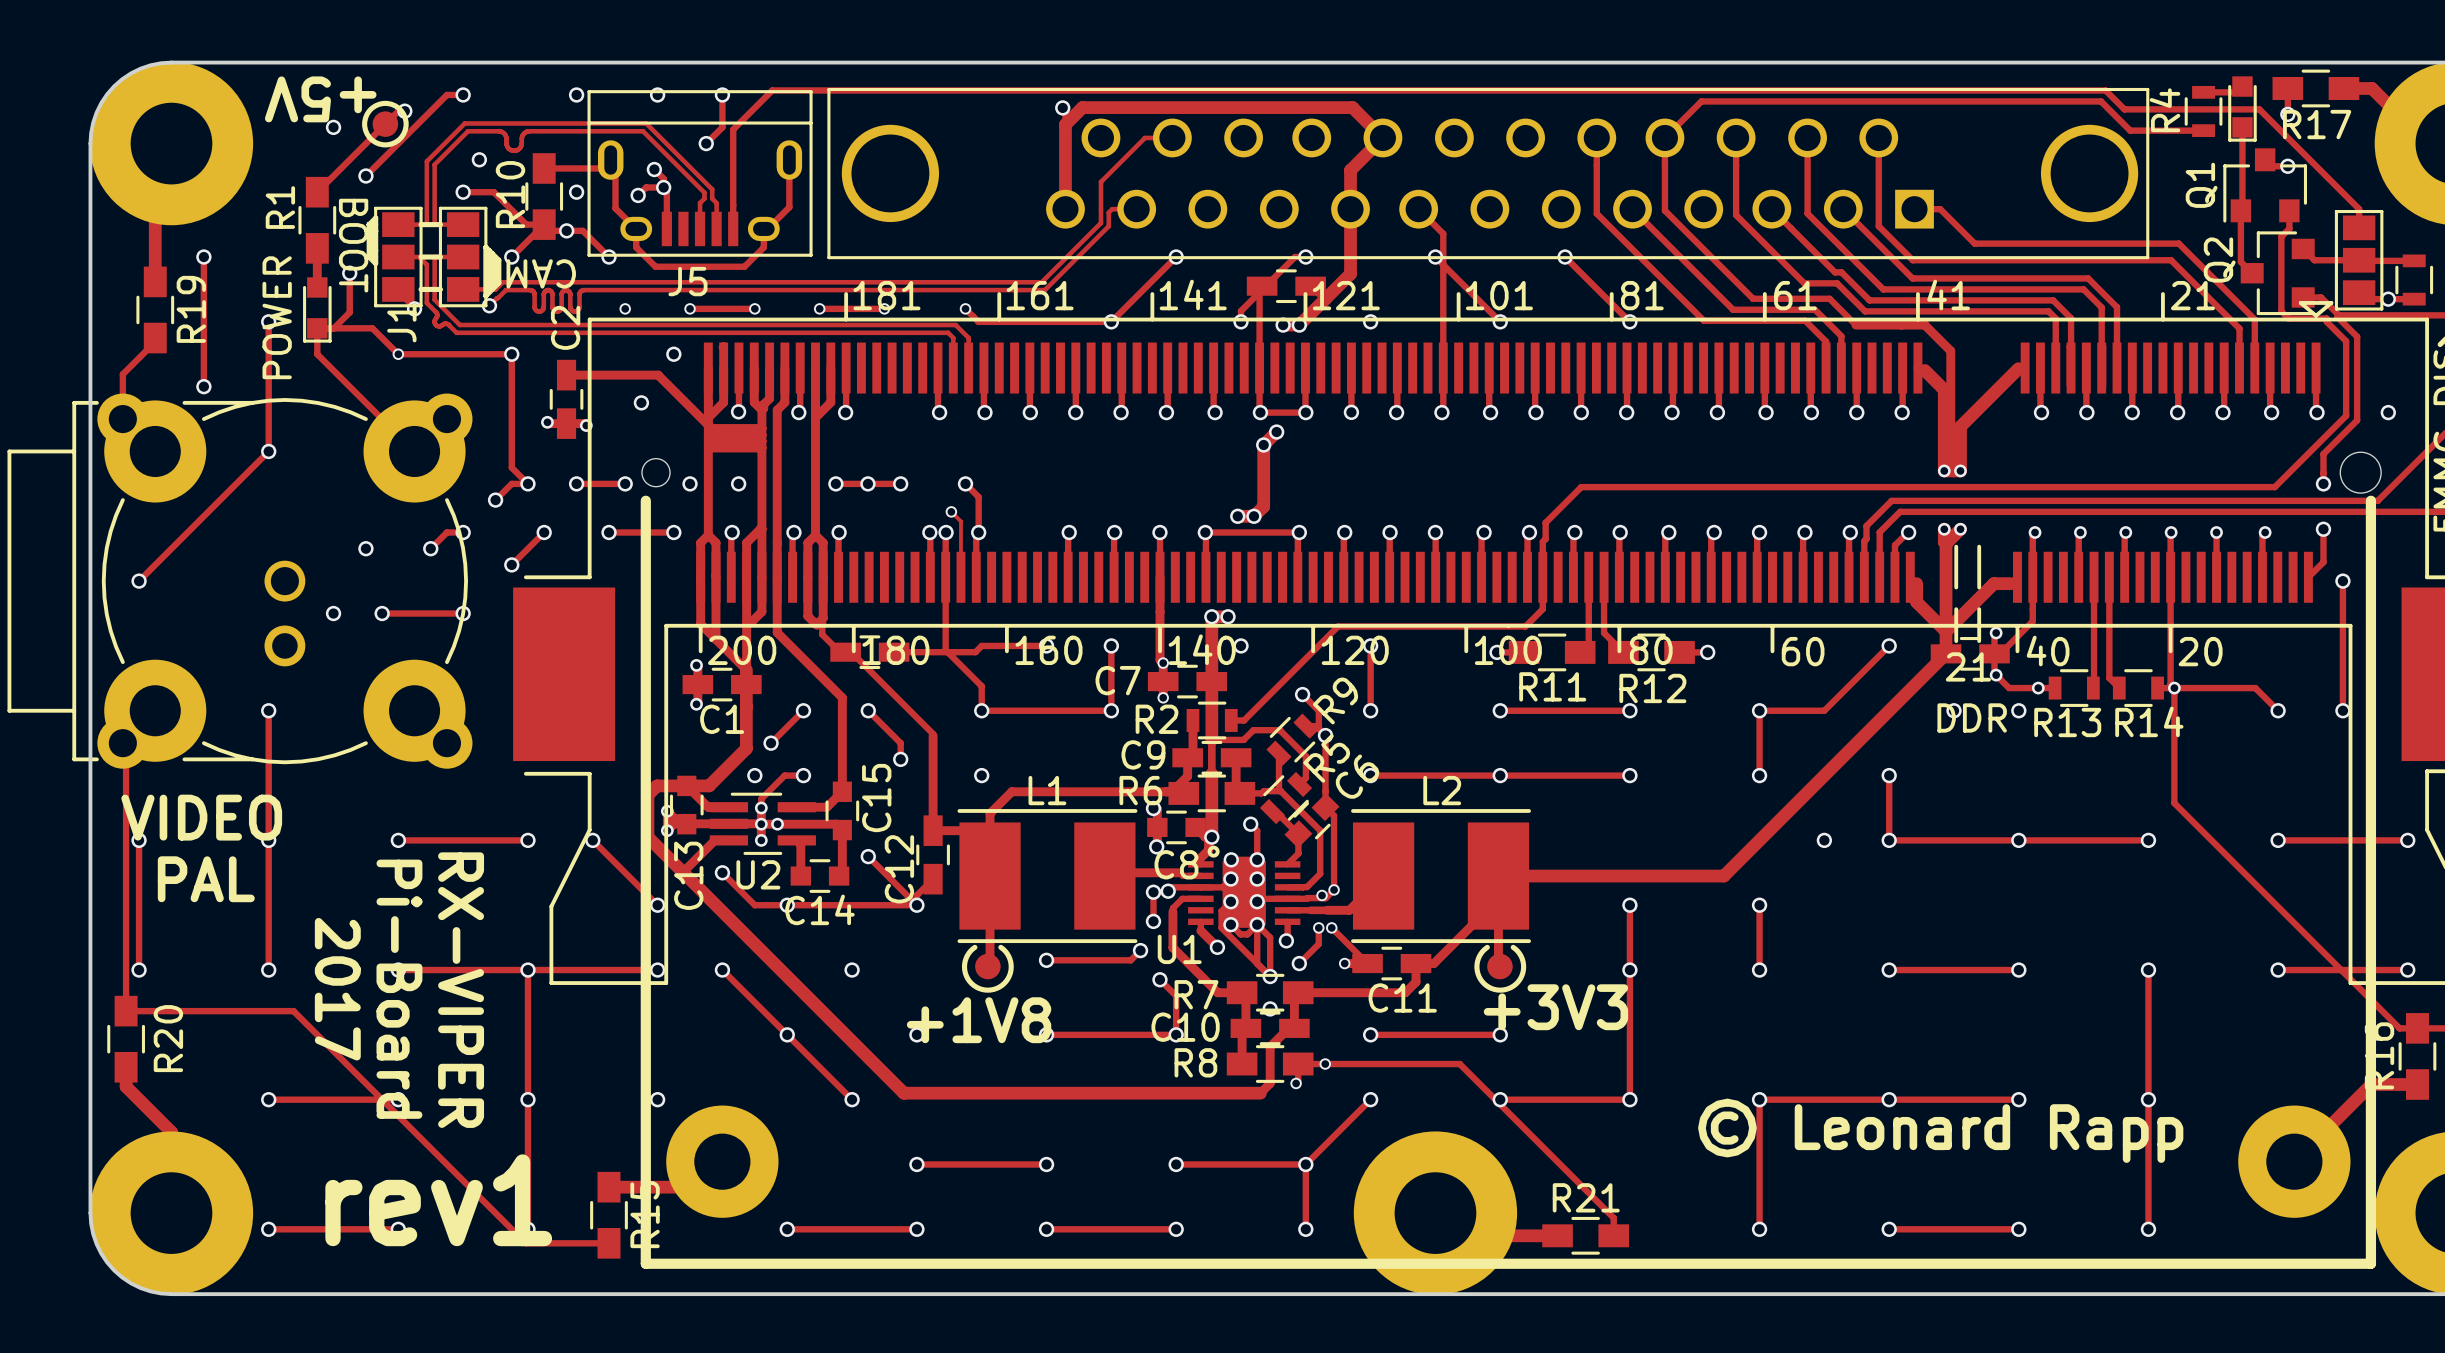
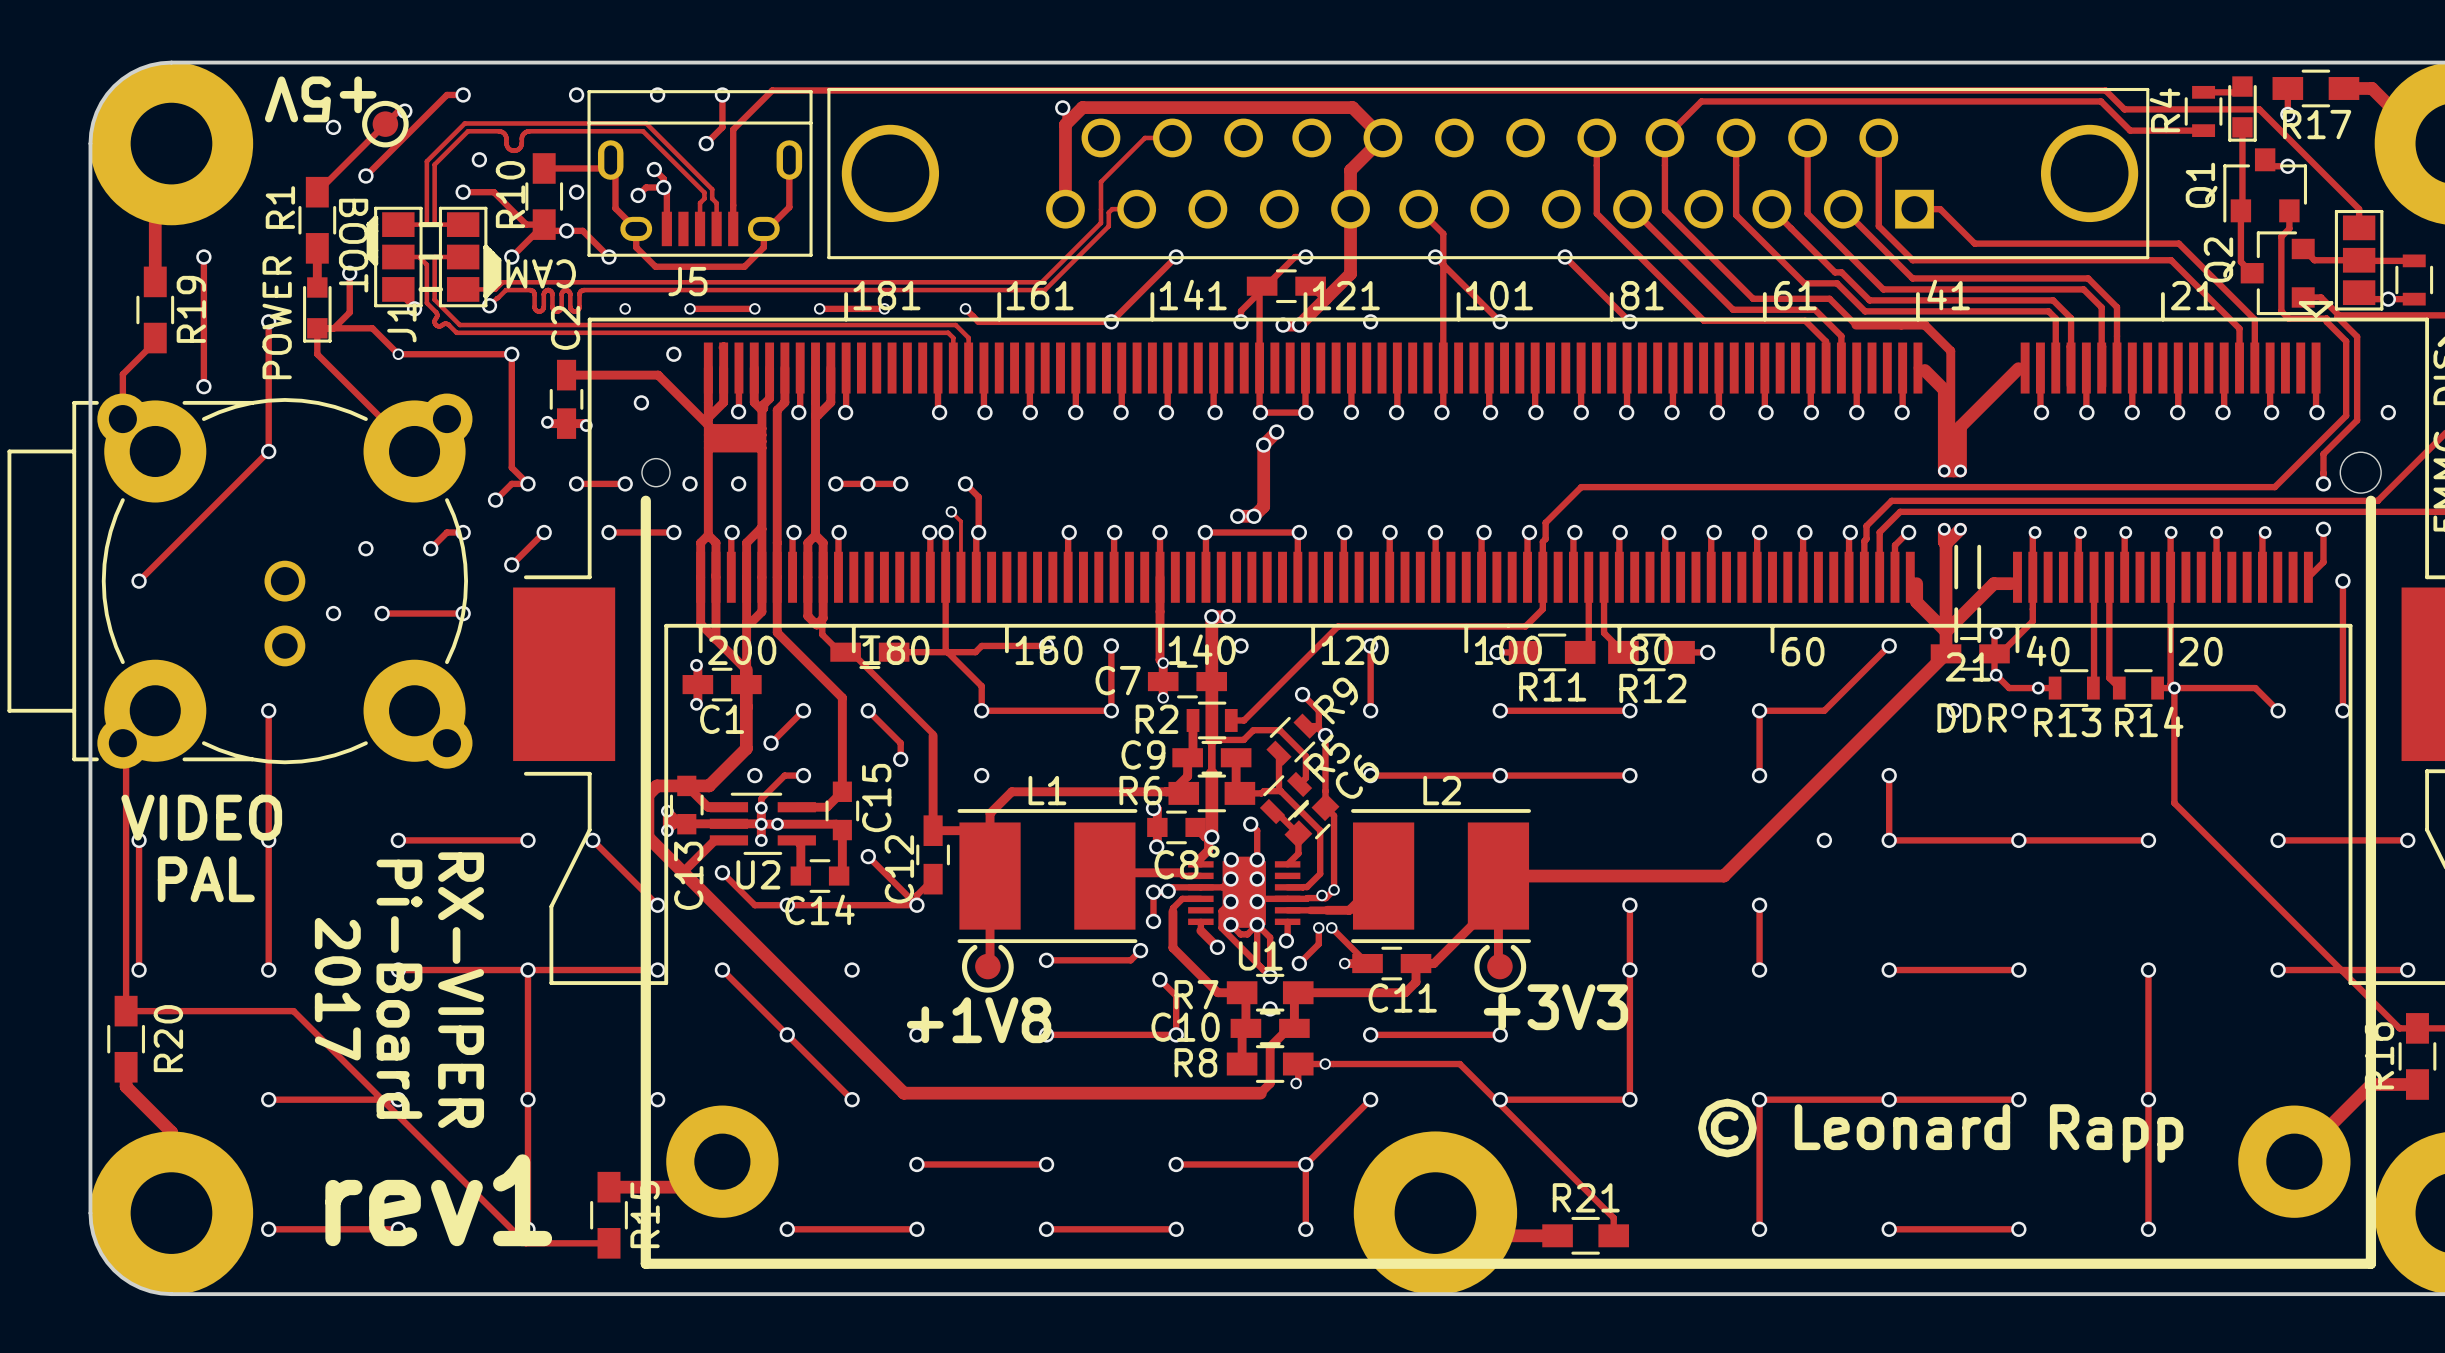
U1 name position: U1 (1179, 949) -> U1 (1260, 955)

